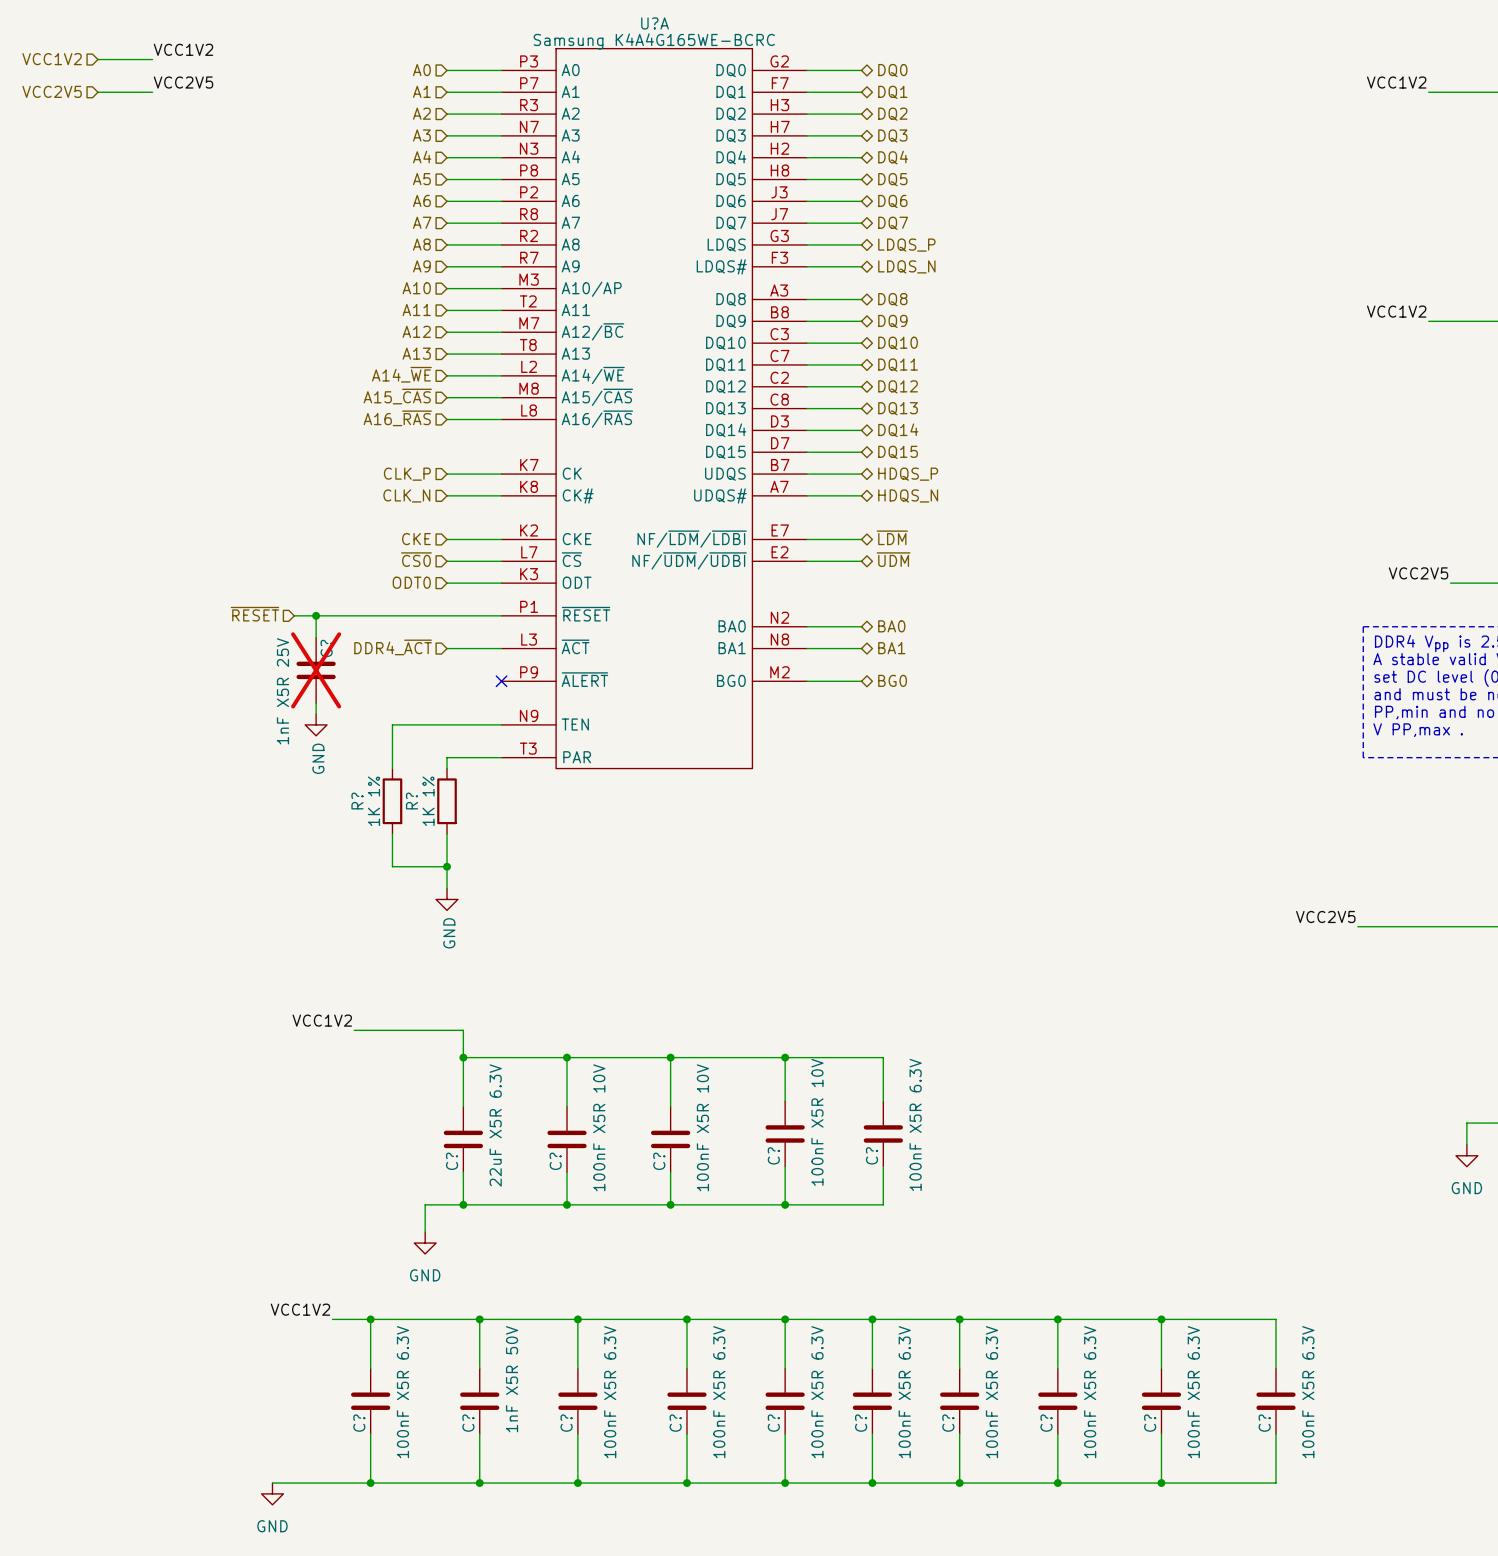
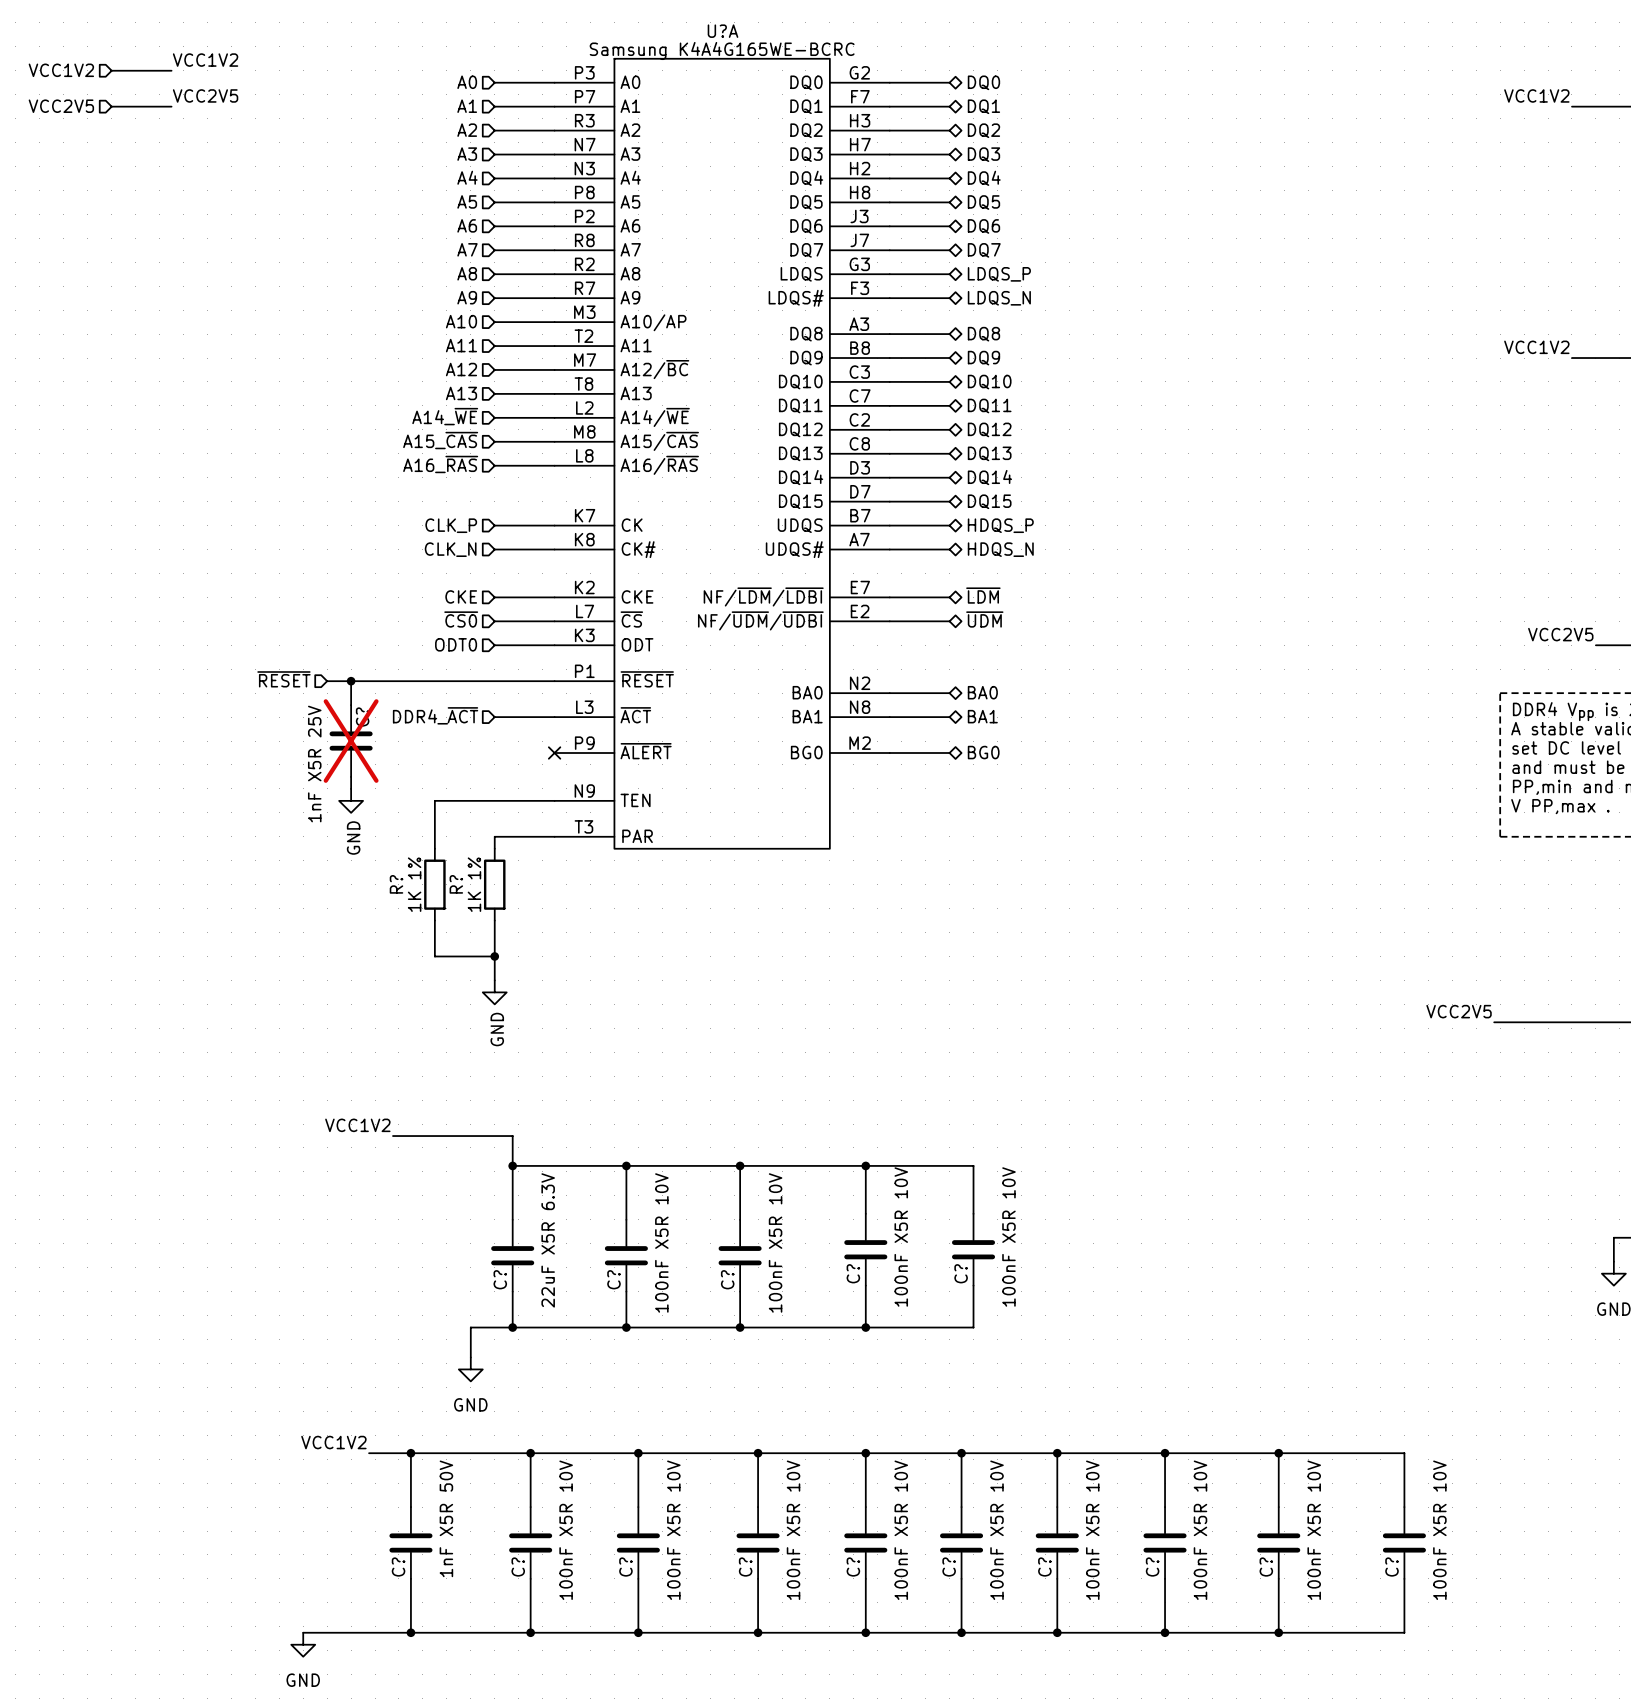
C? value: 100nF X5R 6.3V (915, 1124) -> 100nF X5R 10V (1008, 1237)
C? value: 1nF X5R 50V (512, 1379) -> 100nF X5R 10V (566, 1530)
C? value: 100nF X5R 6.3V (402, 1392) -> 1nF X5R 50V (446, 1518)
C? value: 100nF X5R 6.3V (610, 1392) -> 100nF X5R 10V (673, 1530)
C? value: 100nF X5R 6.3V (719, 1392) -> 100nF X5R 10V (793, 1530)
C? value: 100nF X5R 6.3V (817, 1392) -> 100nF X5R 10V (901, 1530)
C? value: 100nF X5R 6.3V (904, 1392) -> 100nF X5R 10V (997, 1530)
C? value: 100nF X5R 6.3V (991, 1392) -> 100nF X5R 10V (1092, 1530)
C? value: 100nF X5R 6.3V (1090, 1392) -> 100nF X5R 10V (1200, 1530)
C? value: 100nF X5R 6.3V (1193, 1392) -> 100nF X5R 10V (1314, 1530)
C? value: 100nF X5R 6.3V (1308, 1392) -> 100nF X5R 10V (1439, 1530)

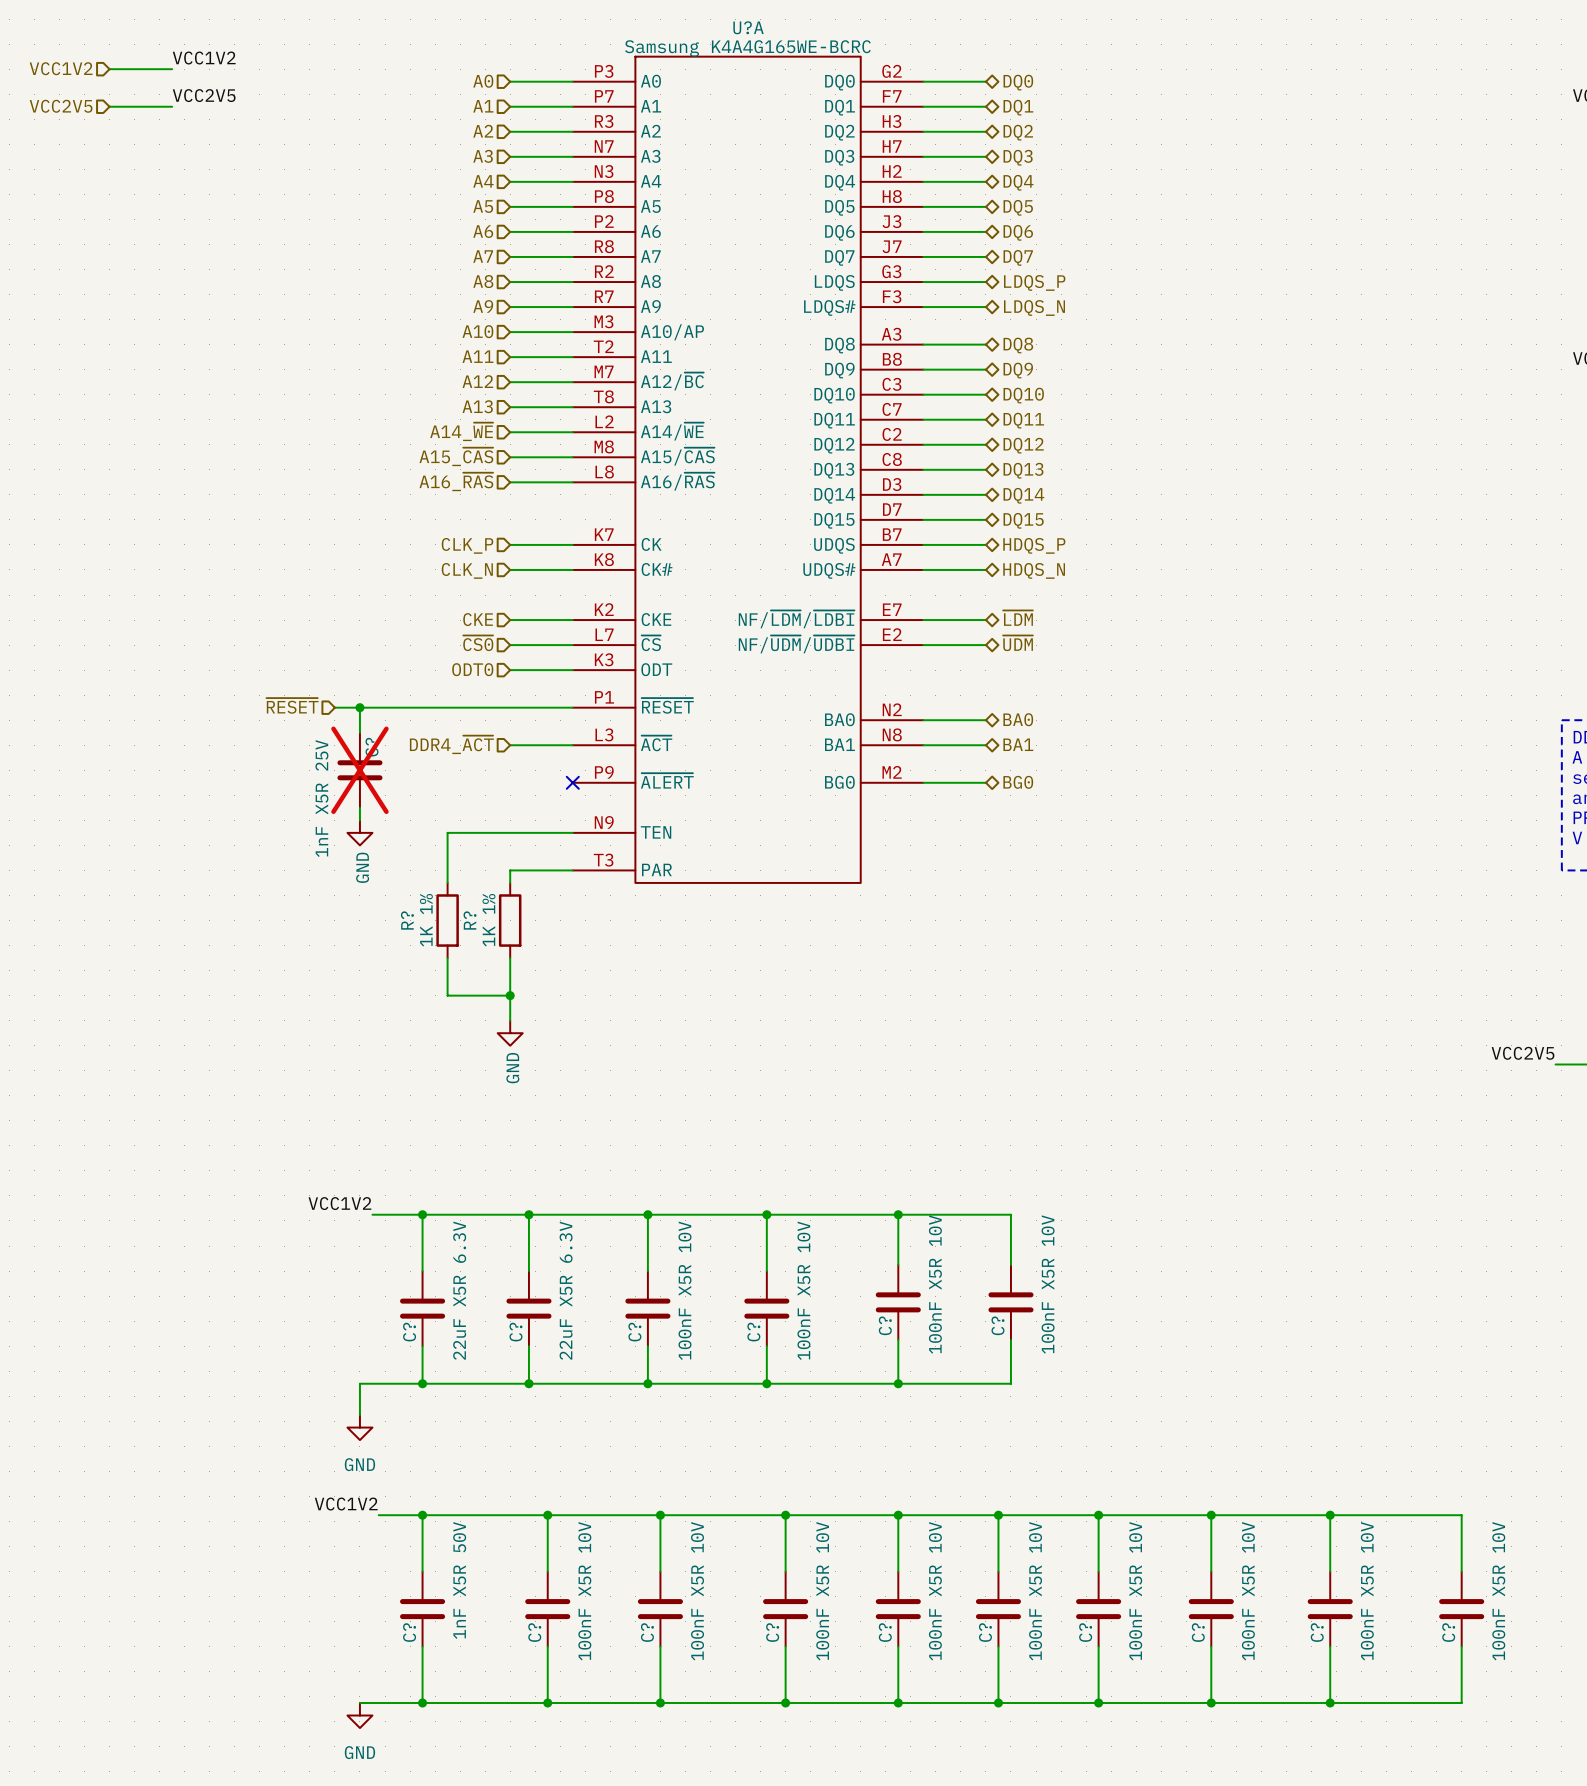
label position: VCC1V2 (357, 1125) -> VCC1V2 (339, 1203)
wire: (392, 1136) (512, 1136) (512, 1165) -> (372, 1214) (528, 1214)
wire: none -> (422, 1214) (422, 1271)
junction: none -> (422, 1214)
C?: none -> 22uF X5R 6.3V (422, 1308)
wire: none -> (422, 1346) (422, 1383)
junction: none -> (422, 1383)
wire: (470, 1327) (470, 1357) -> (485, 1383) (359, 1383) (359, 1415)
power symbol position: GND (470, 1369) -> GND (359, 1427)
wire: (303, 1632) (351, 1632) -> none
power symbol position: GND (303, 1644) -> GND (359, 1715)

